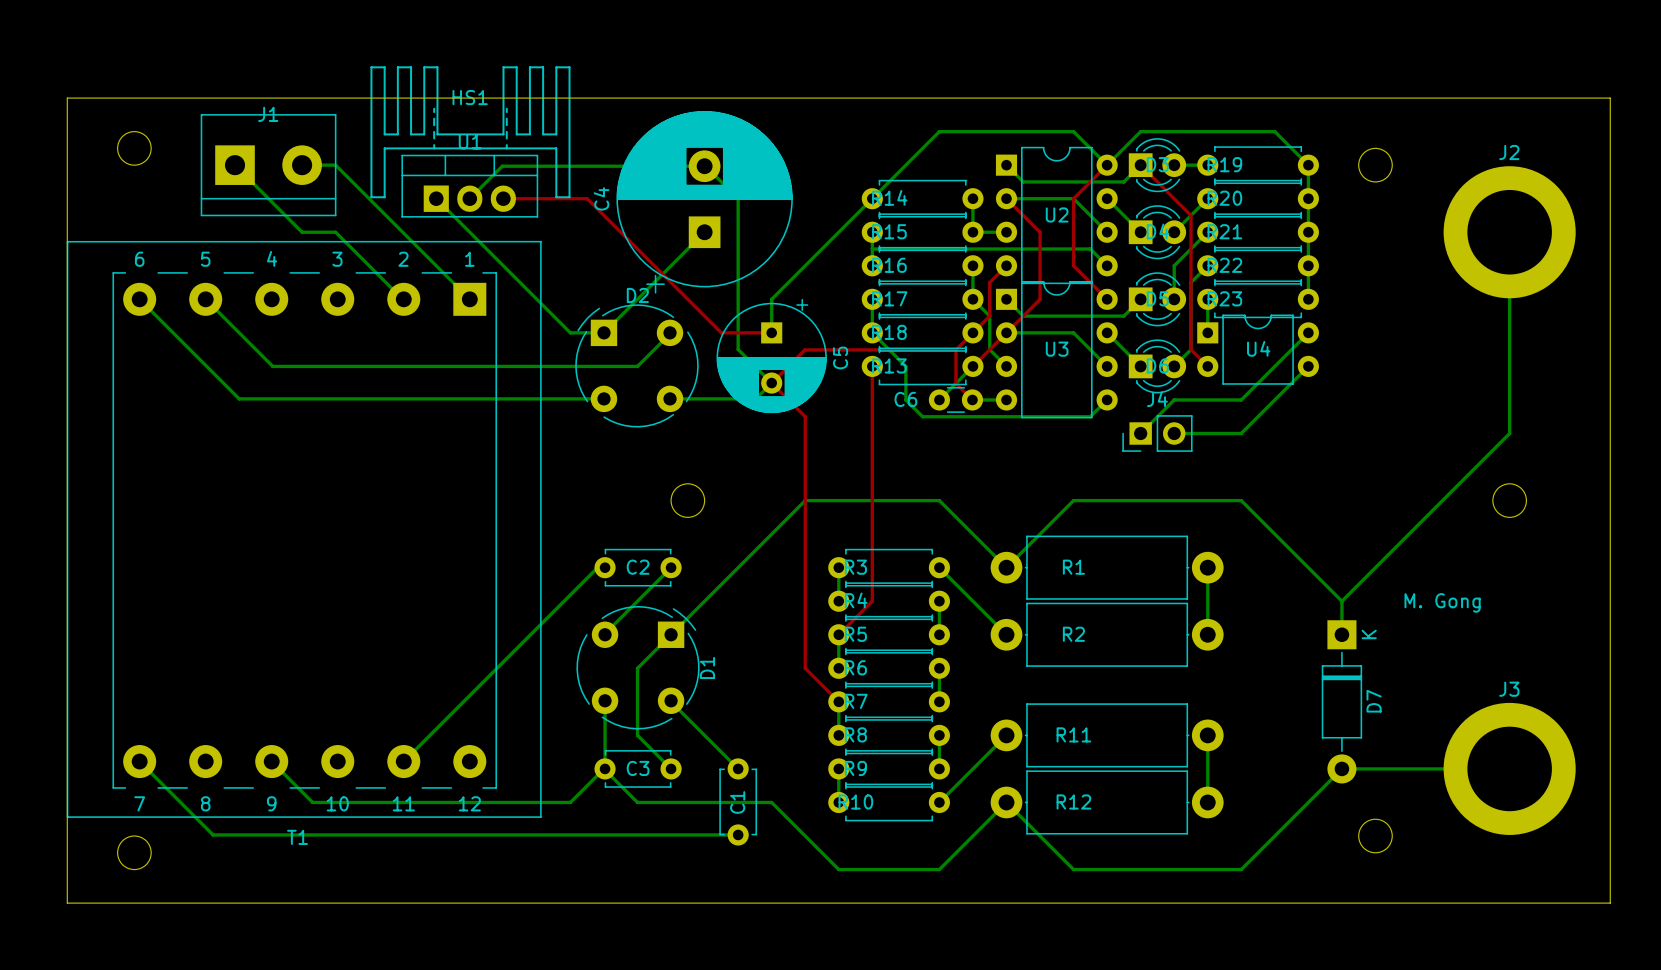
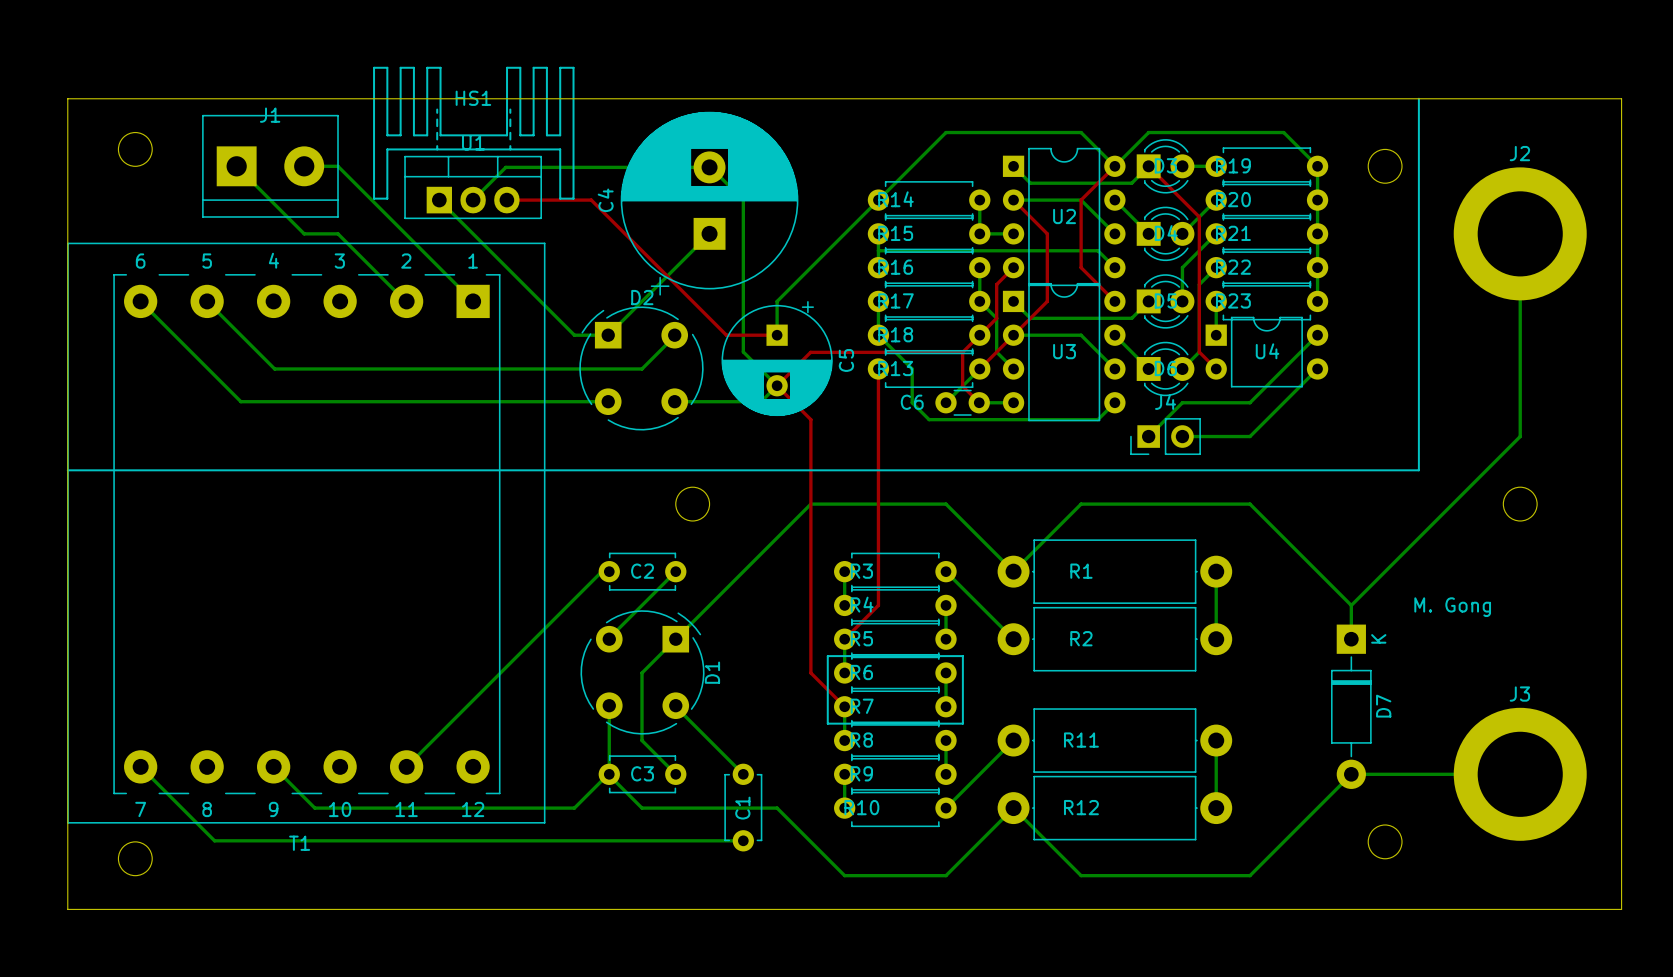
line: none -> (1418, 98) (1418, 470) (67, 470)
line: none -> (827, 656) (962, 656) (962, 723) (827, 723) (827, 656)

